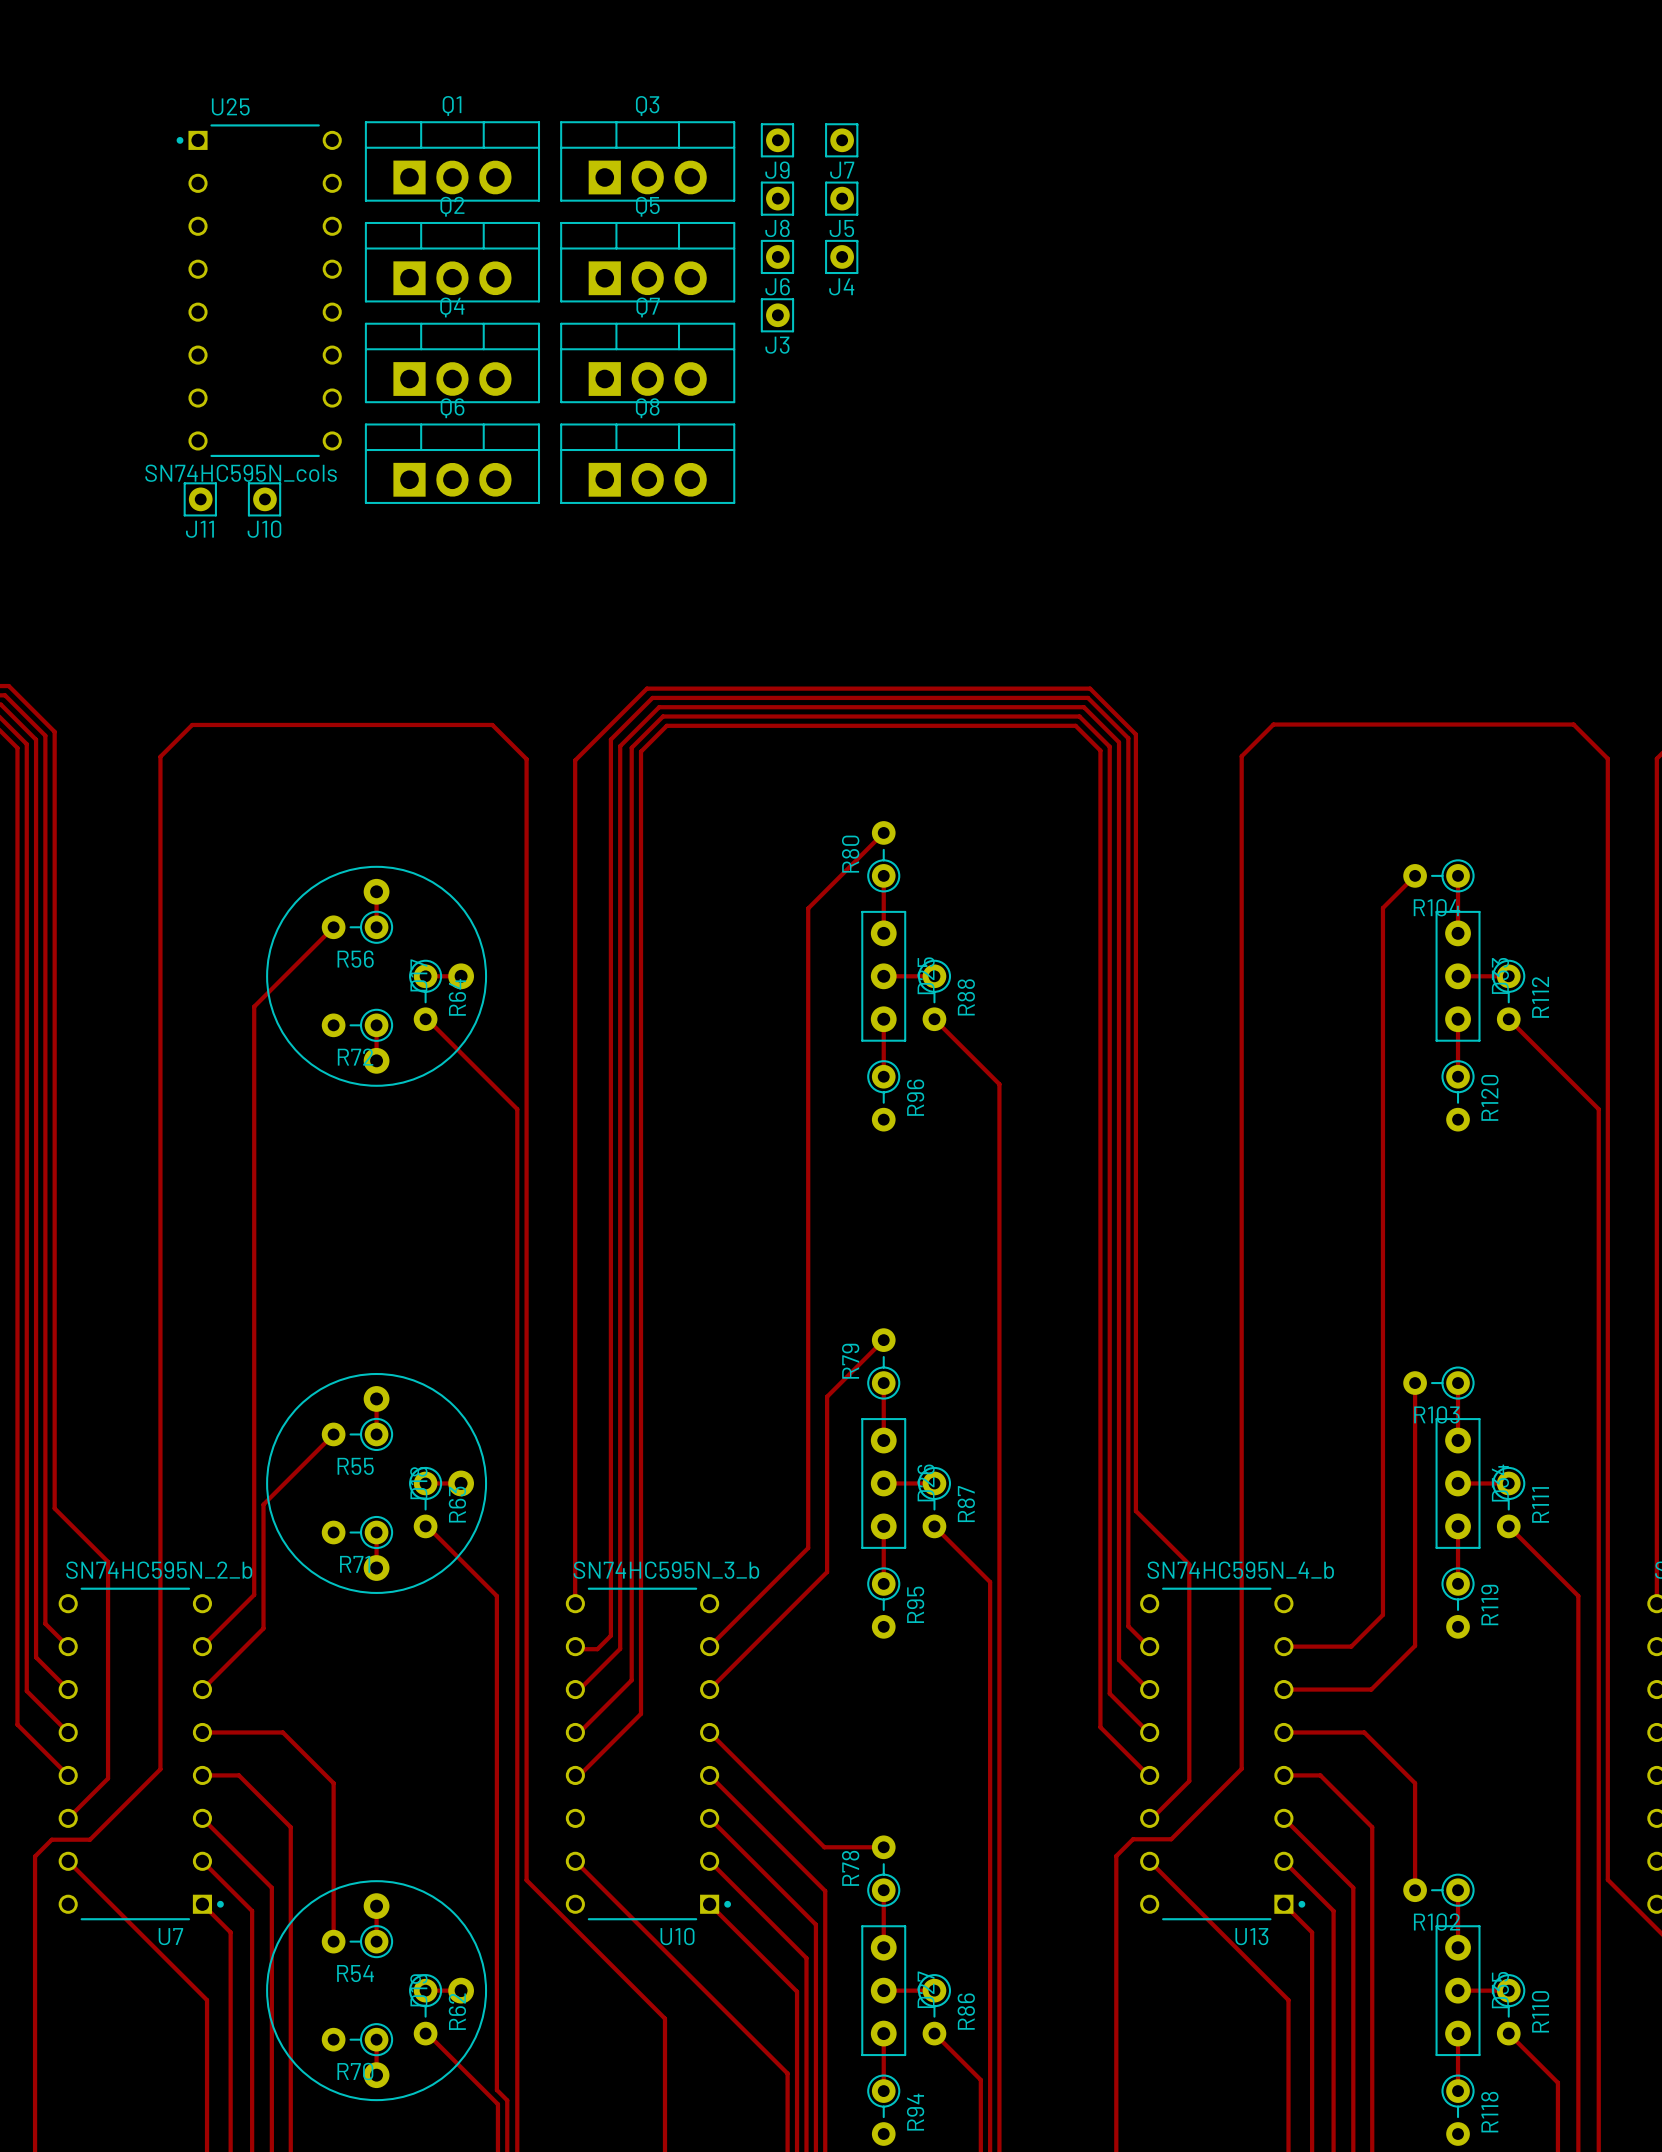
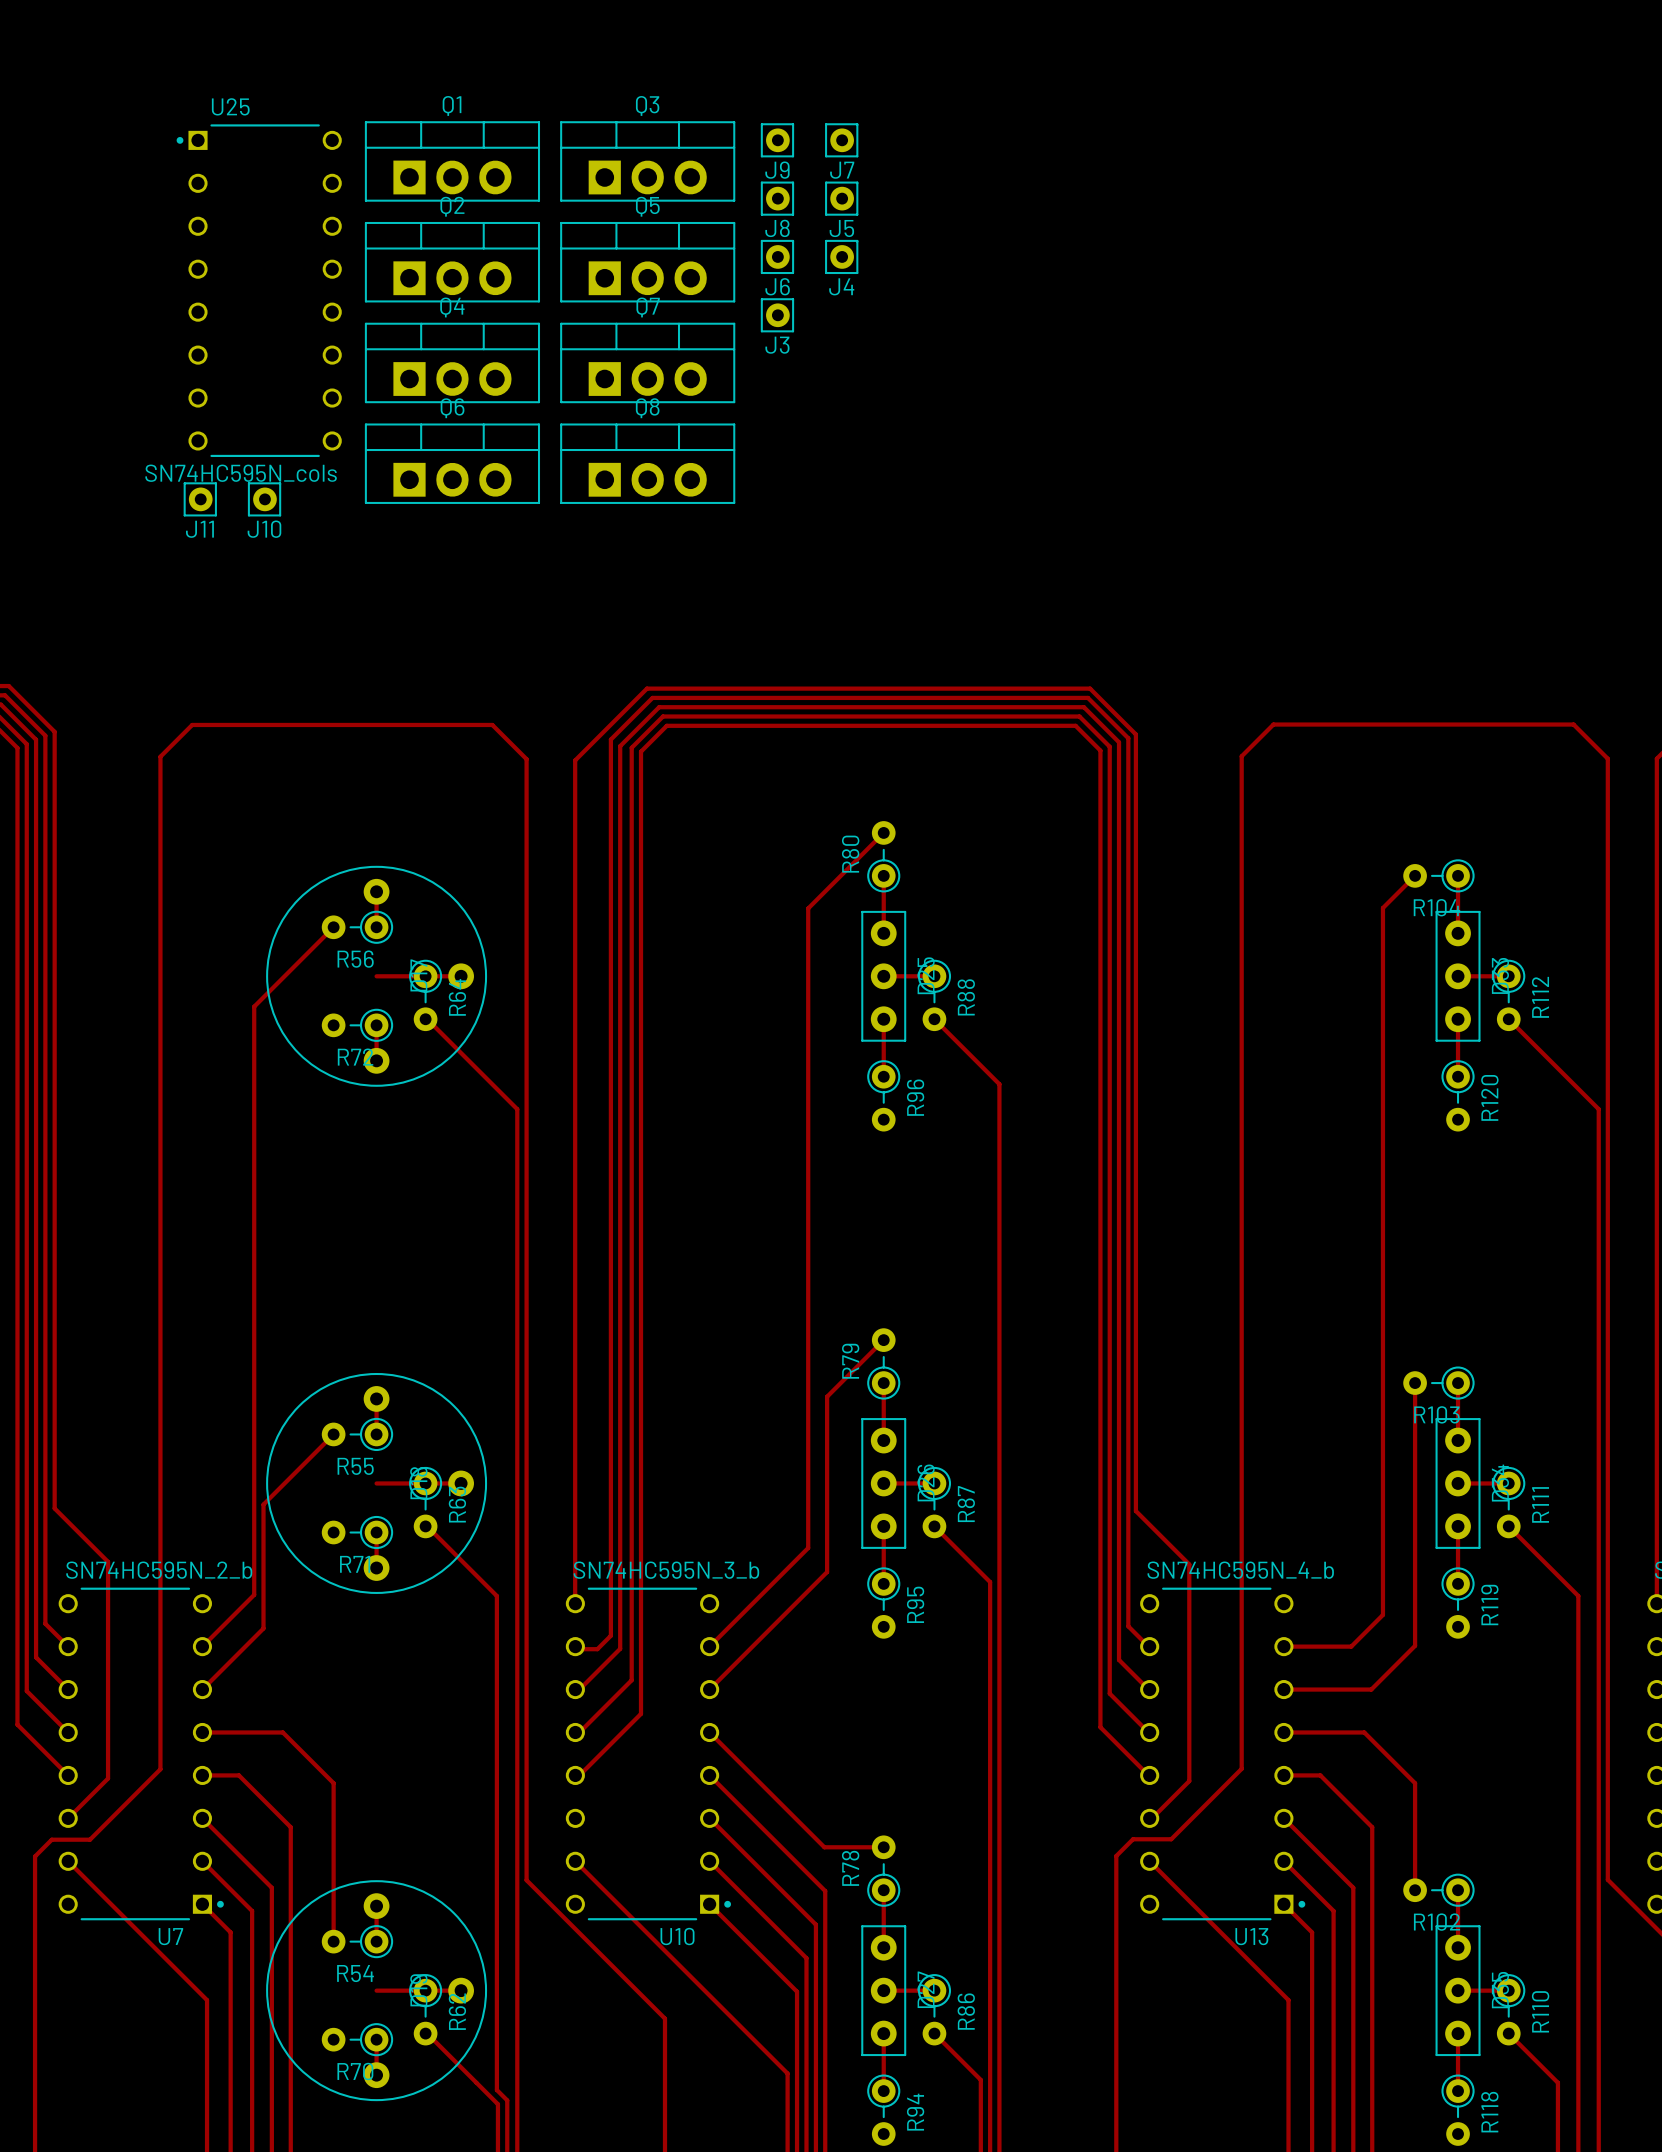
track: none -> (376, 976) (425, 976)
track: none -> (376, 1483) (425, 1483)
track: none -> (376, 1990) (425, 1990)

